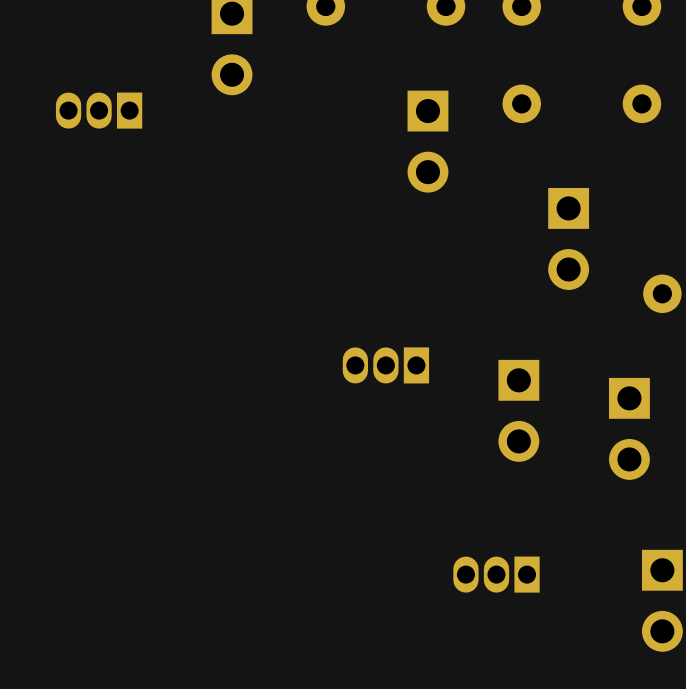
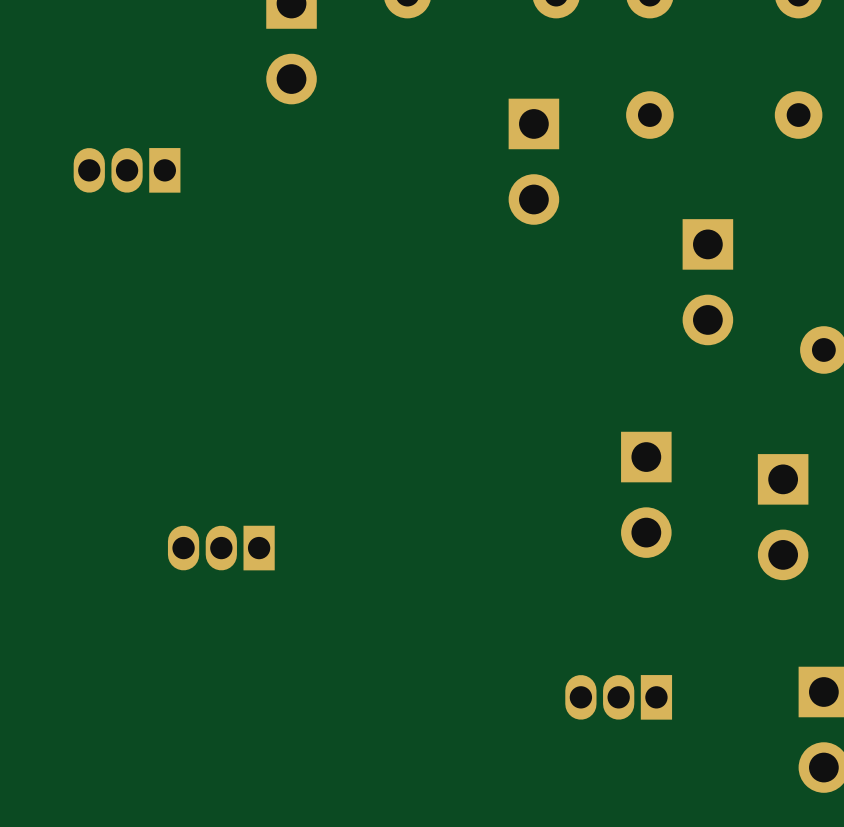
part position: (99, 110) -> (127, 170)
part: (385, 365) -> none
part: none -> (221, 548)

